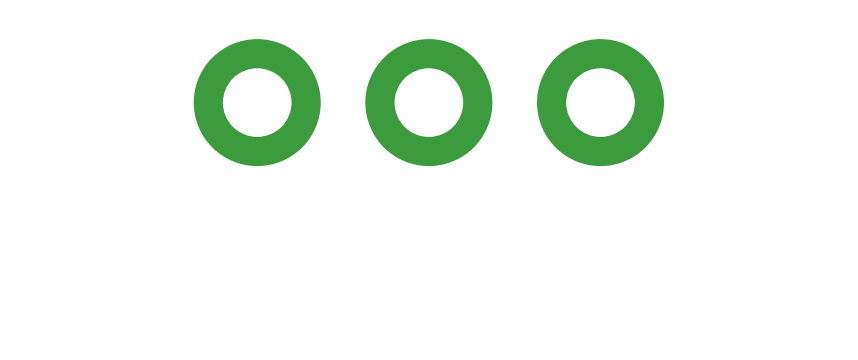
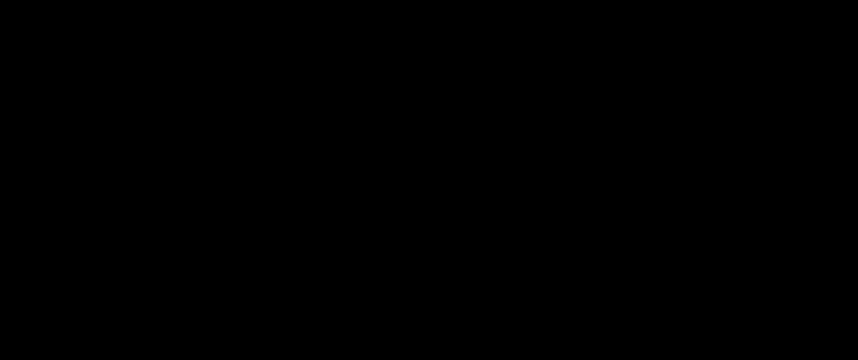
part: (428, 102) -> none

